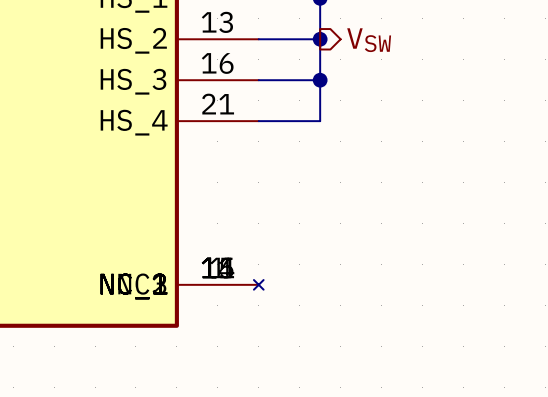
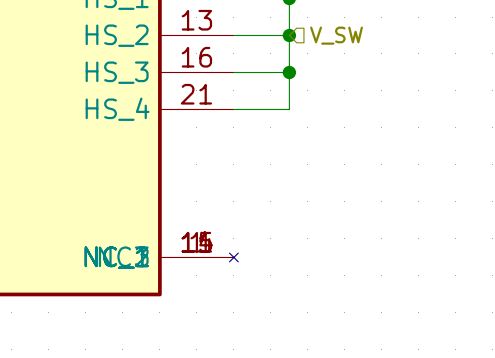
hierarchical label shape: output (369, 40) -> input (336, 35)
hierarchical label: VSW (369, 40) -> V_SW (336, 35)

